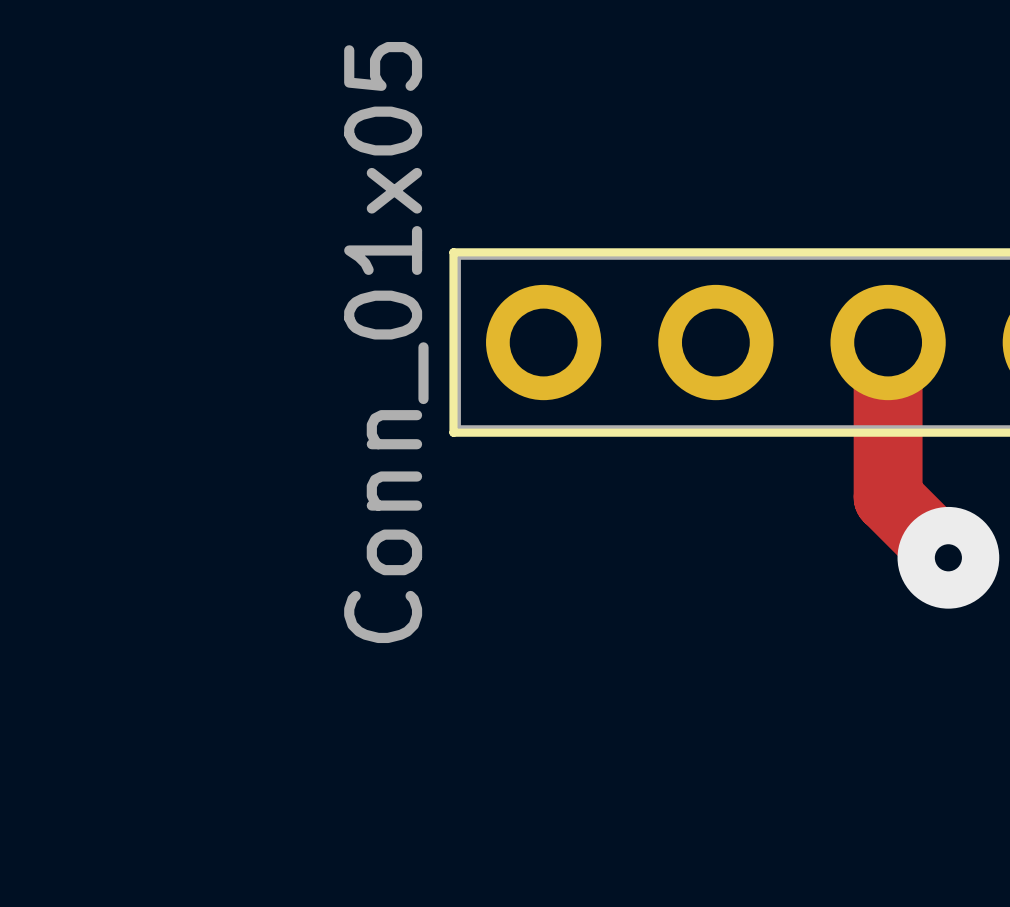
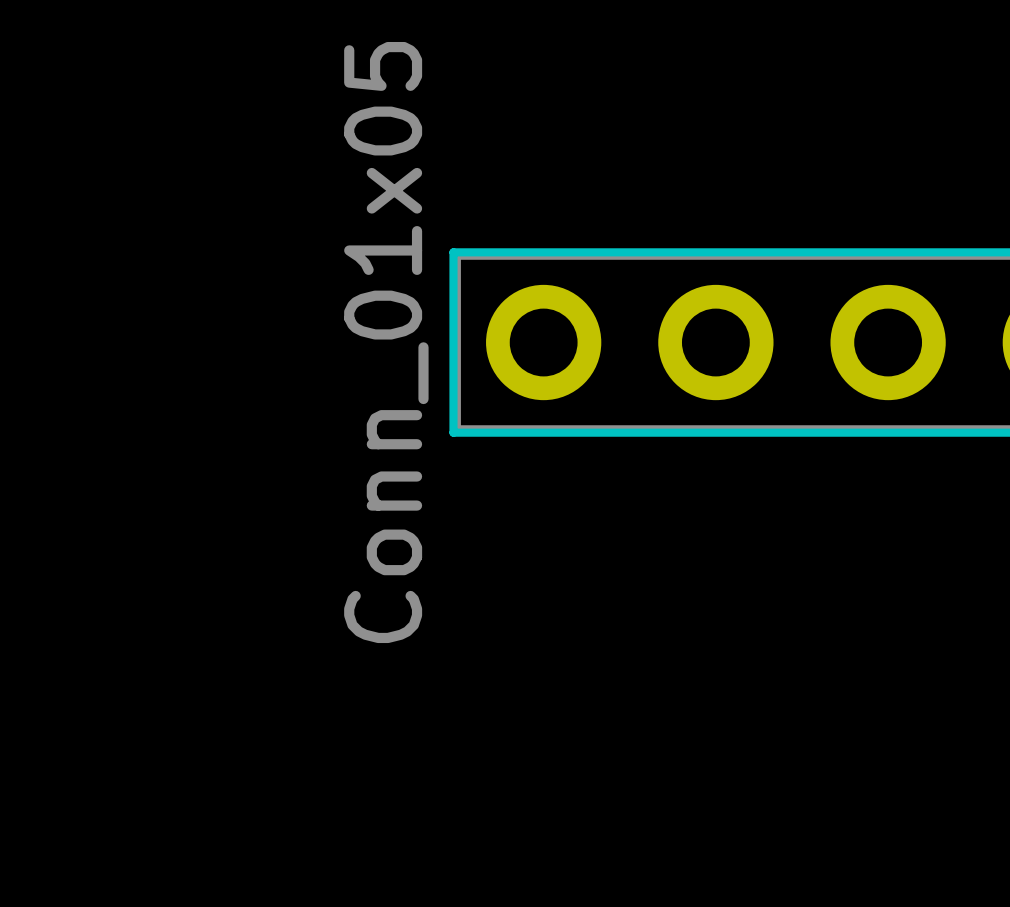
track: (888, 342) (888, 497) (948, 557) -> none
via: (948, 557) -> none

